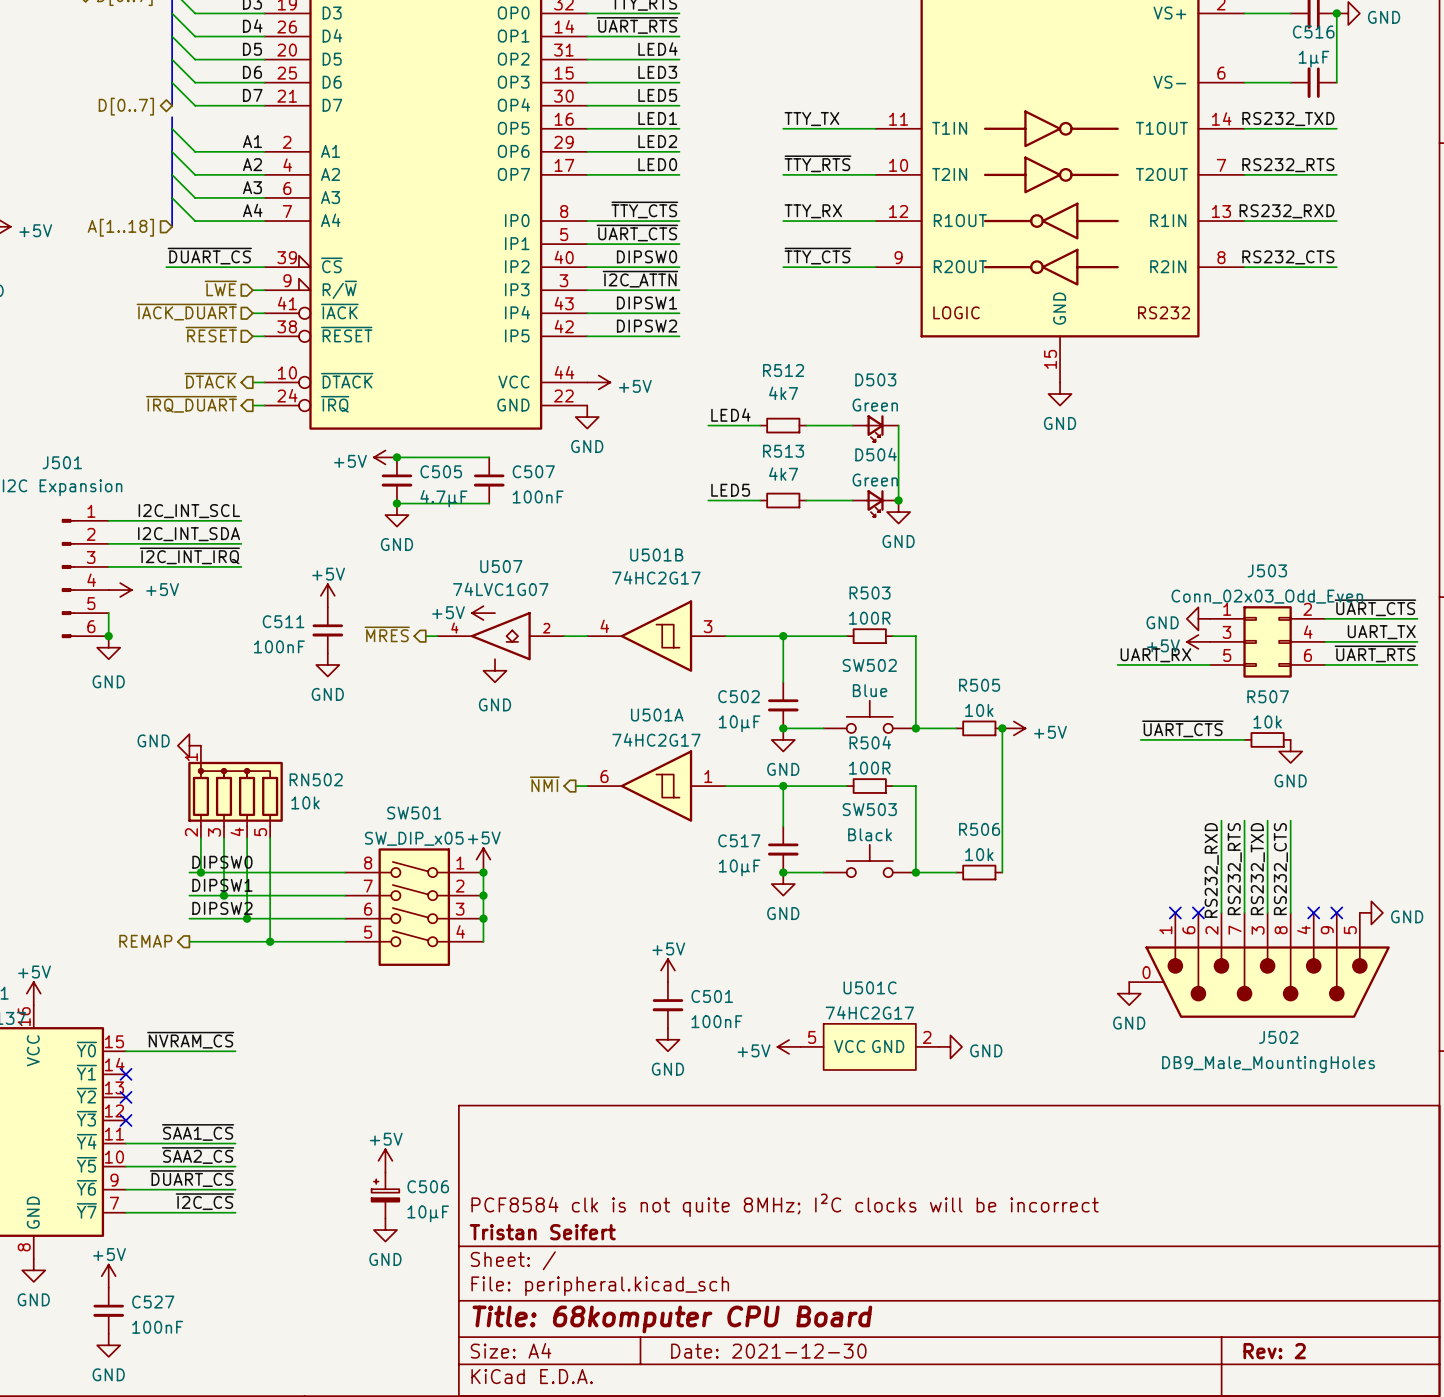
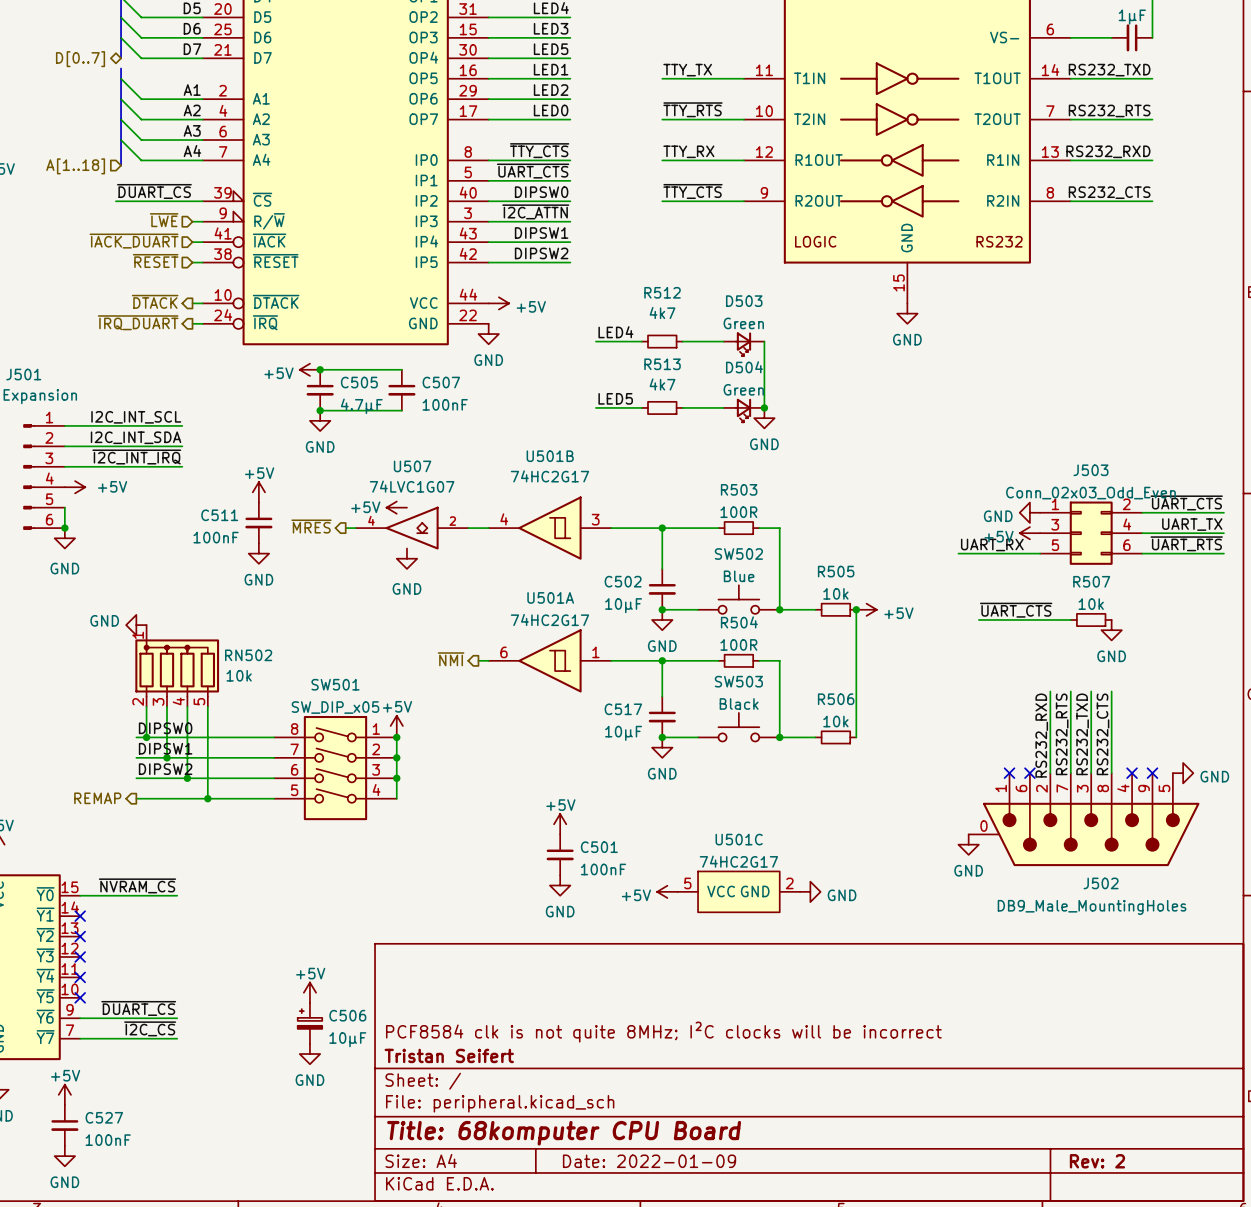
label: ~{SAA1_CS} (198, 1132) -> none
wire: (125, 1143) (235, 1143) -> none
no-connect mark: none -> (80, 977)
label: ~{SAA2_CS} (198, 1155) -> none
wire: (125, 1166) (235, 1166) -> none
no-connect mark: none -> (80, 997)
title block: Date: 2021-12-30 (768, 1351) -> Date: 2022-01-09 (649, 1161)

